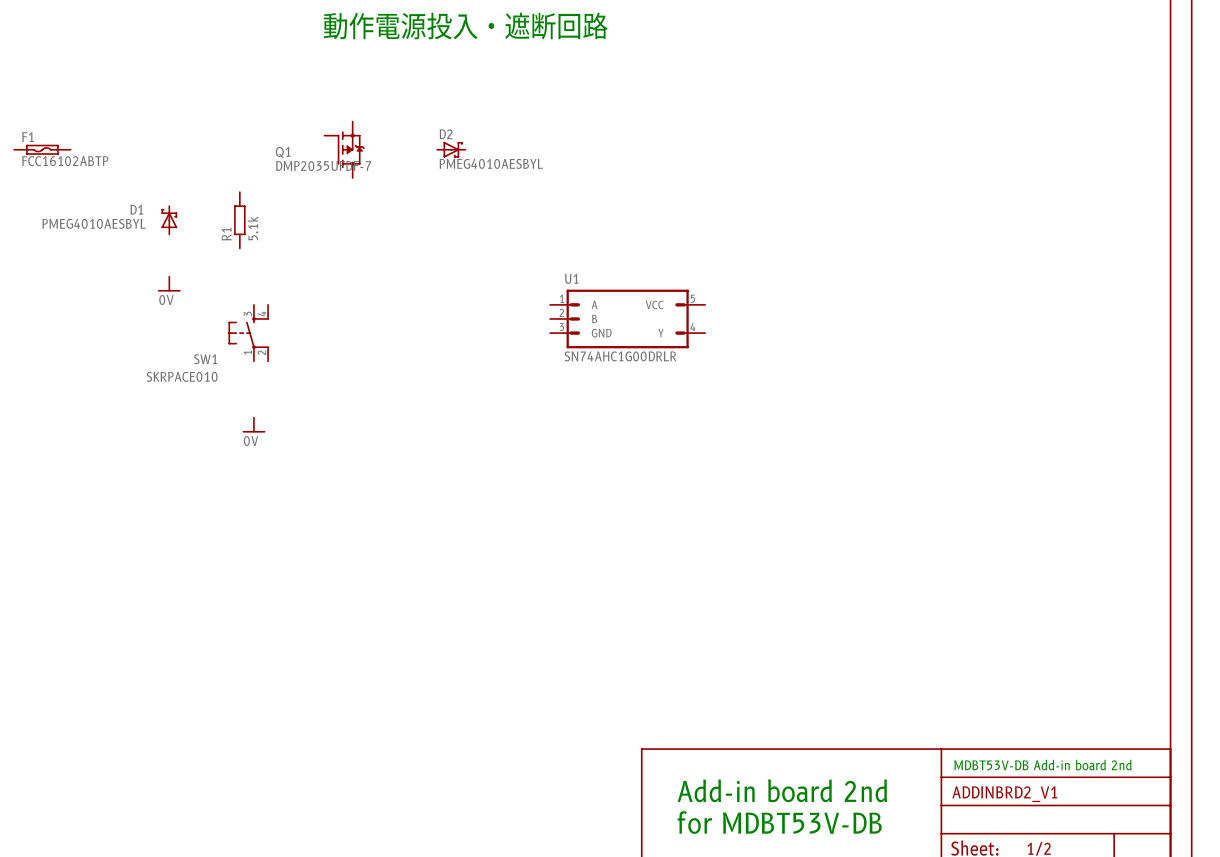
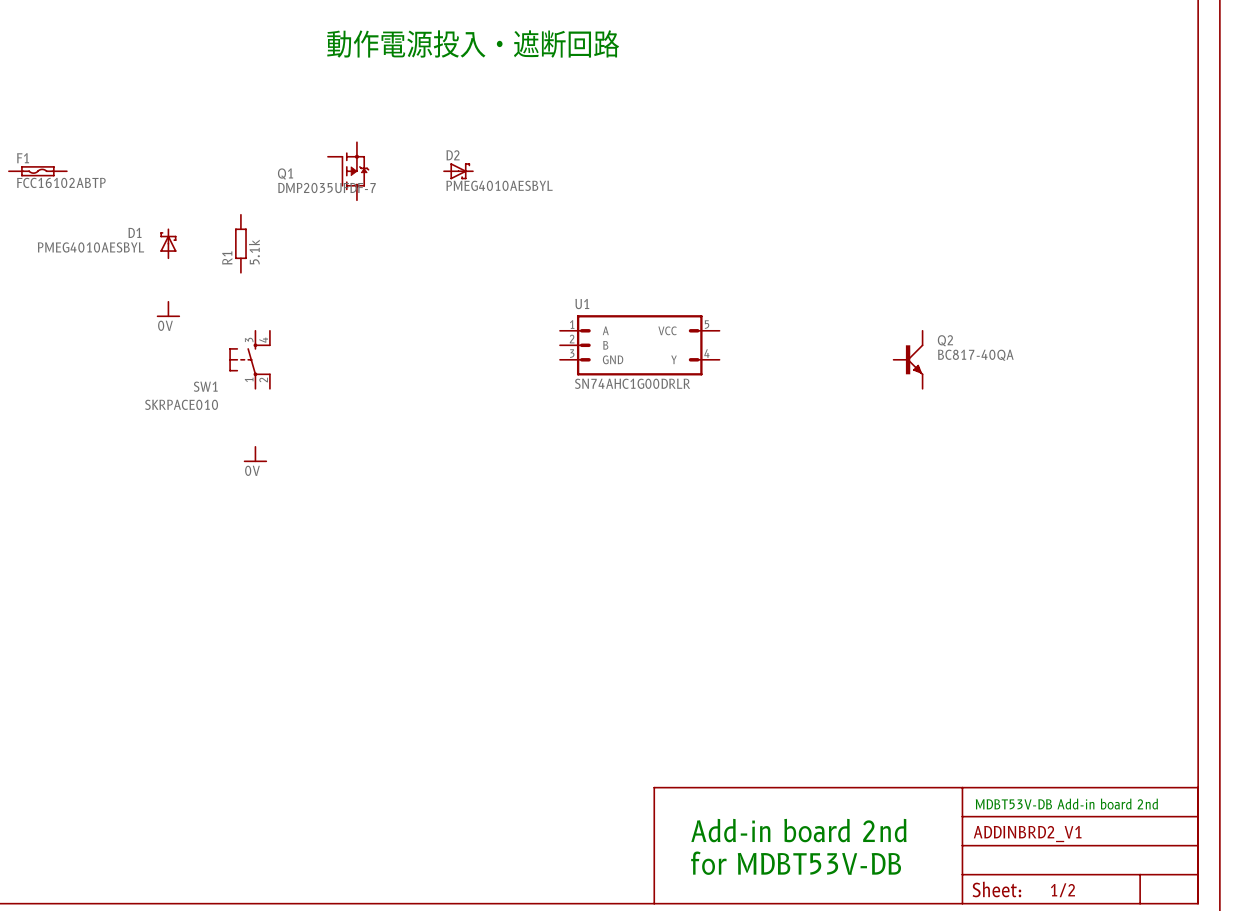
Q2: none -> BC817-40QA (908, 359)

